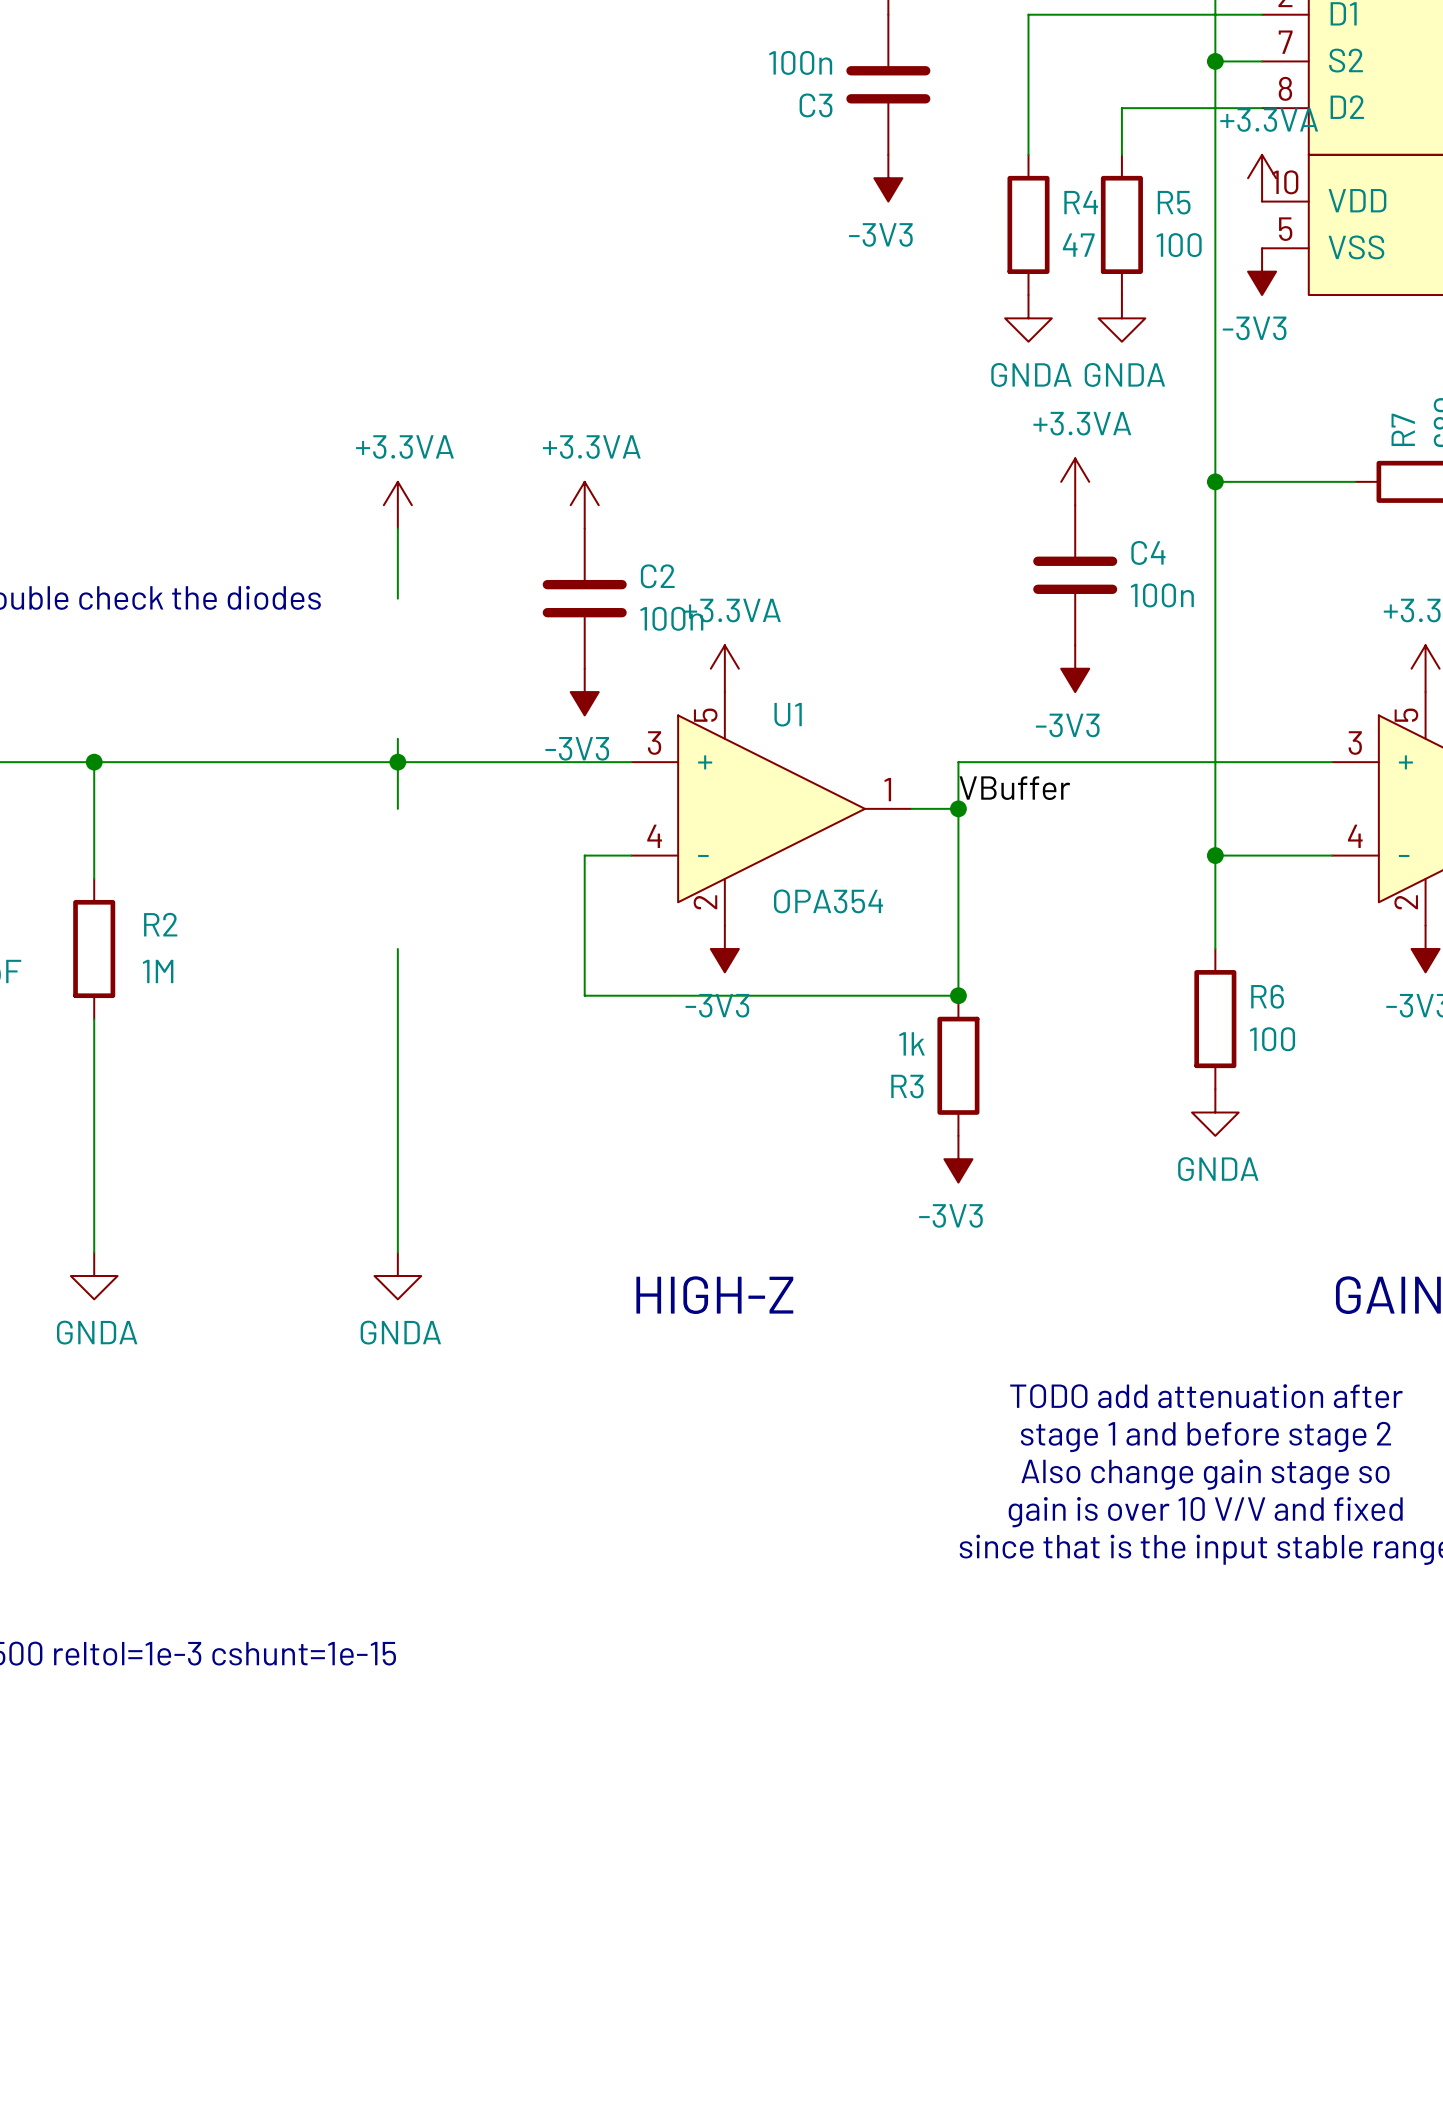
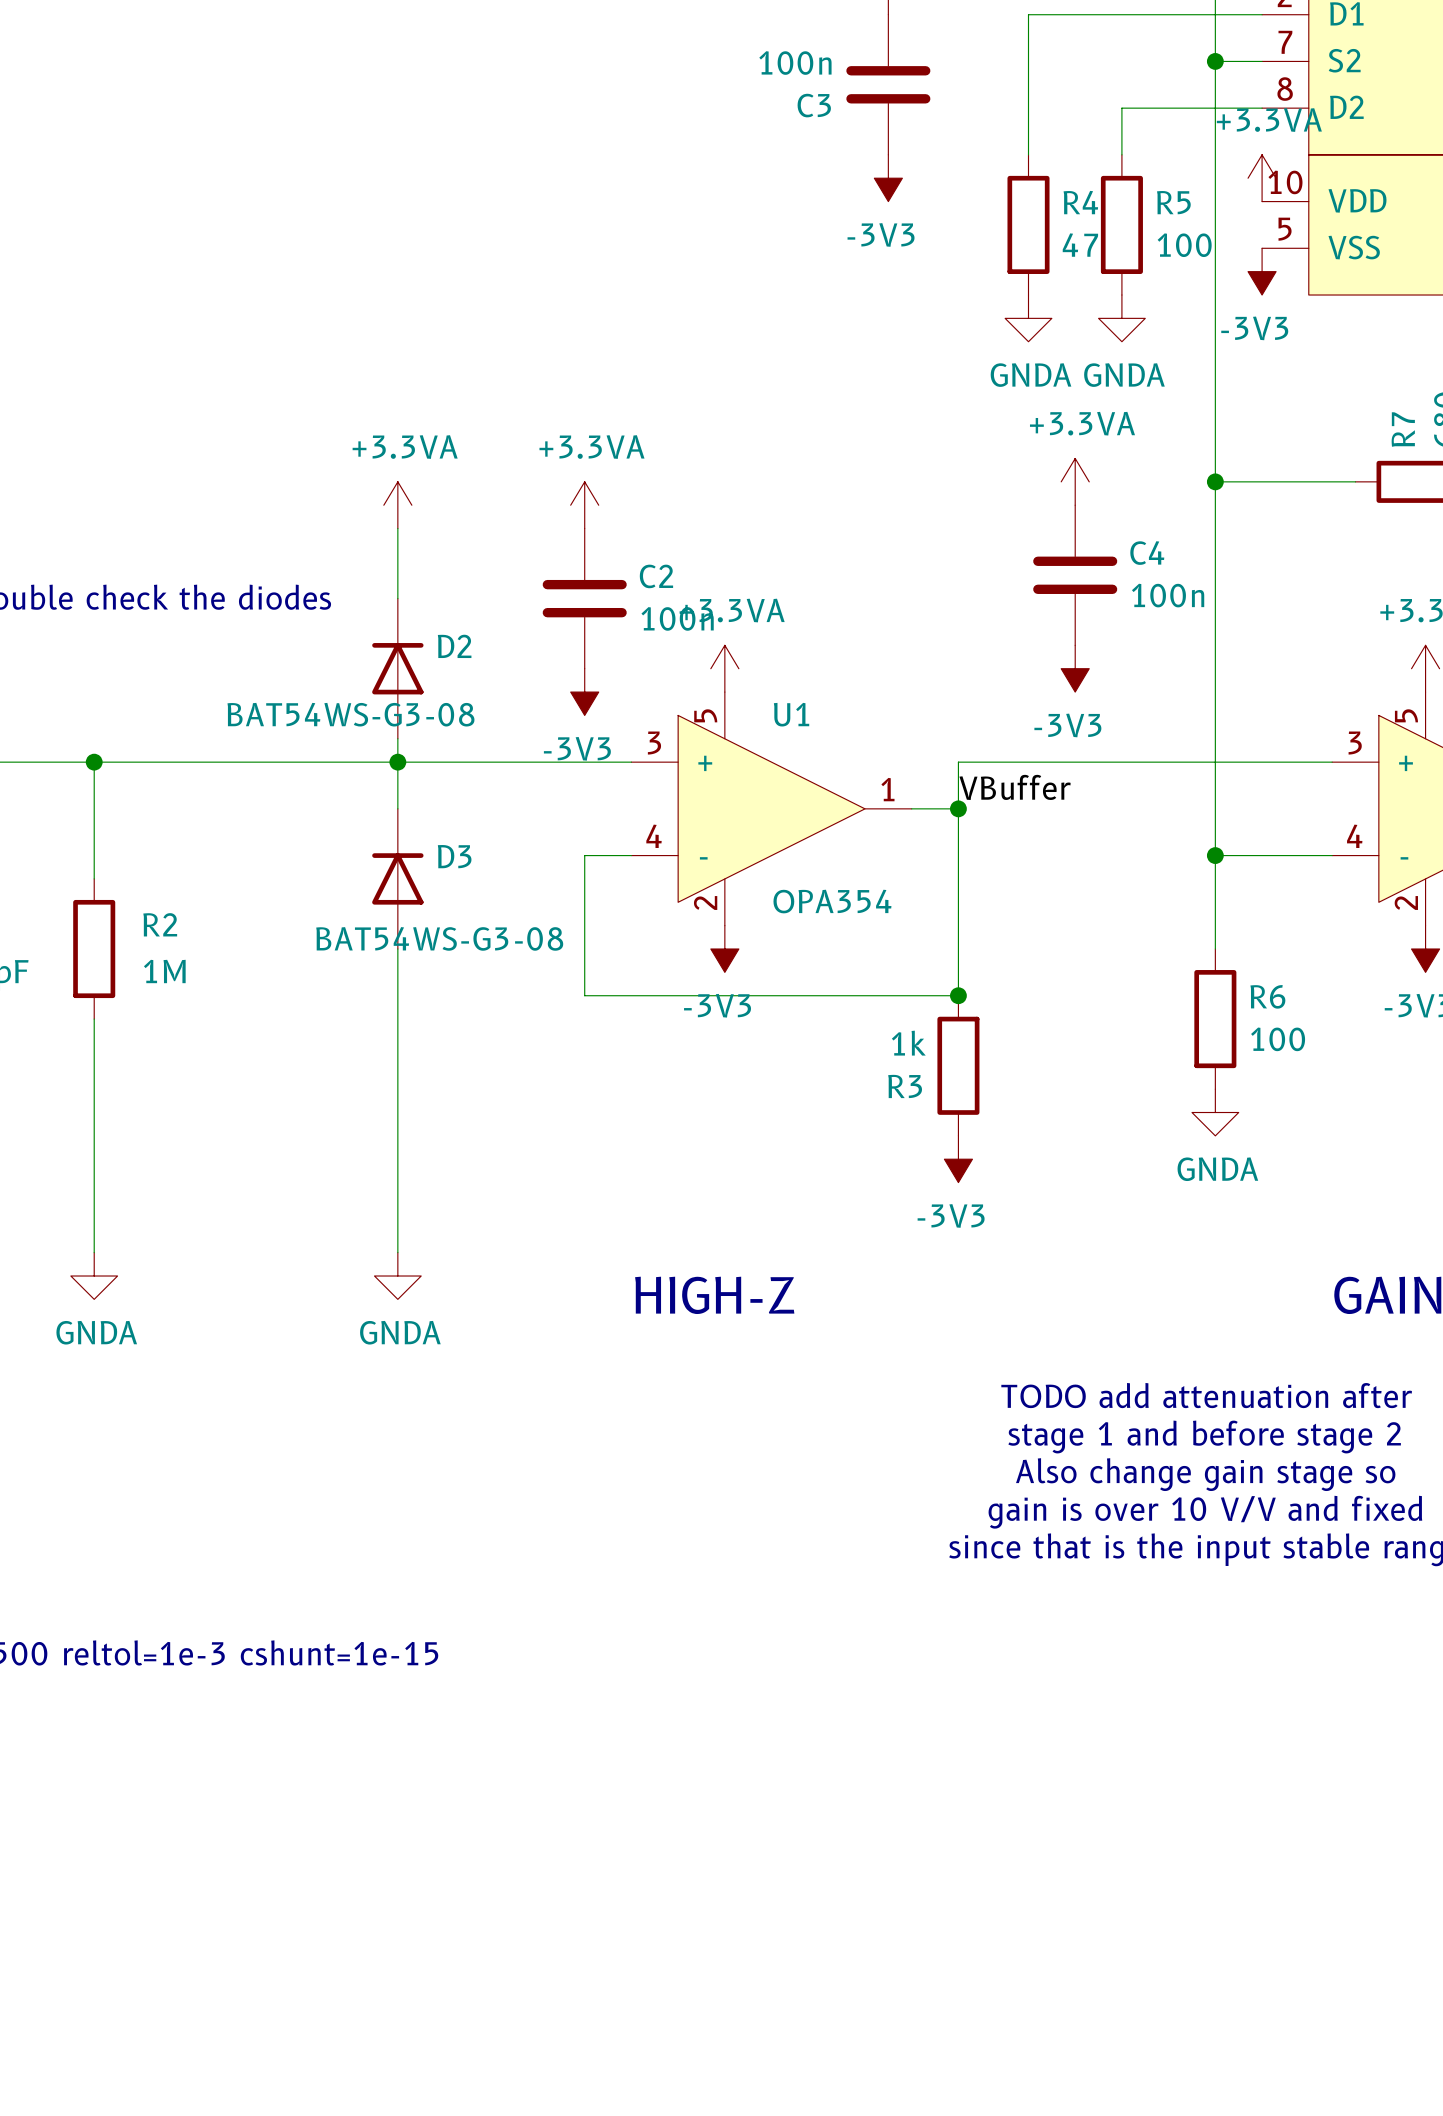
D2: none -> BAT54WS-G3-08 (397, 668)
D3: none -> BAT54WS-G3-08 (397, 878)

